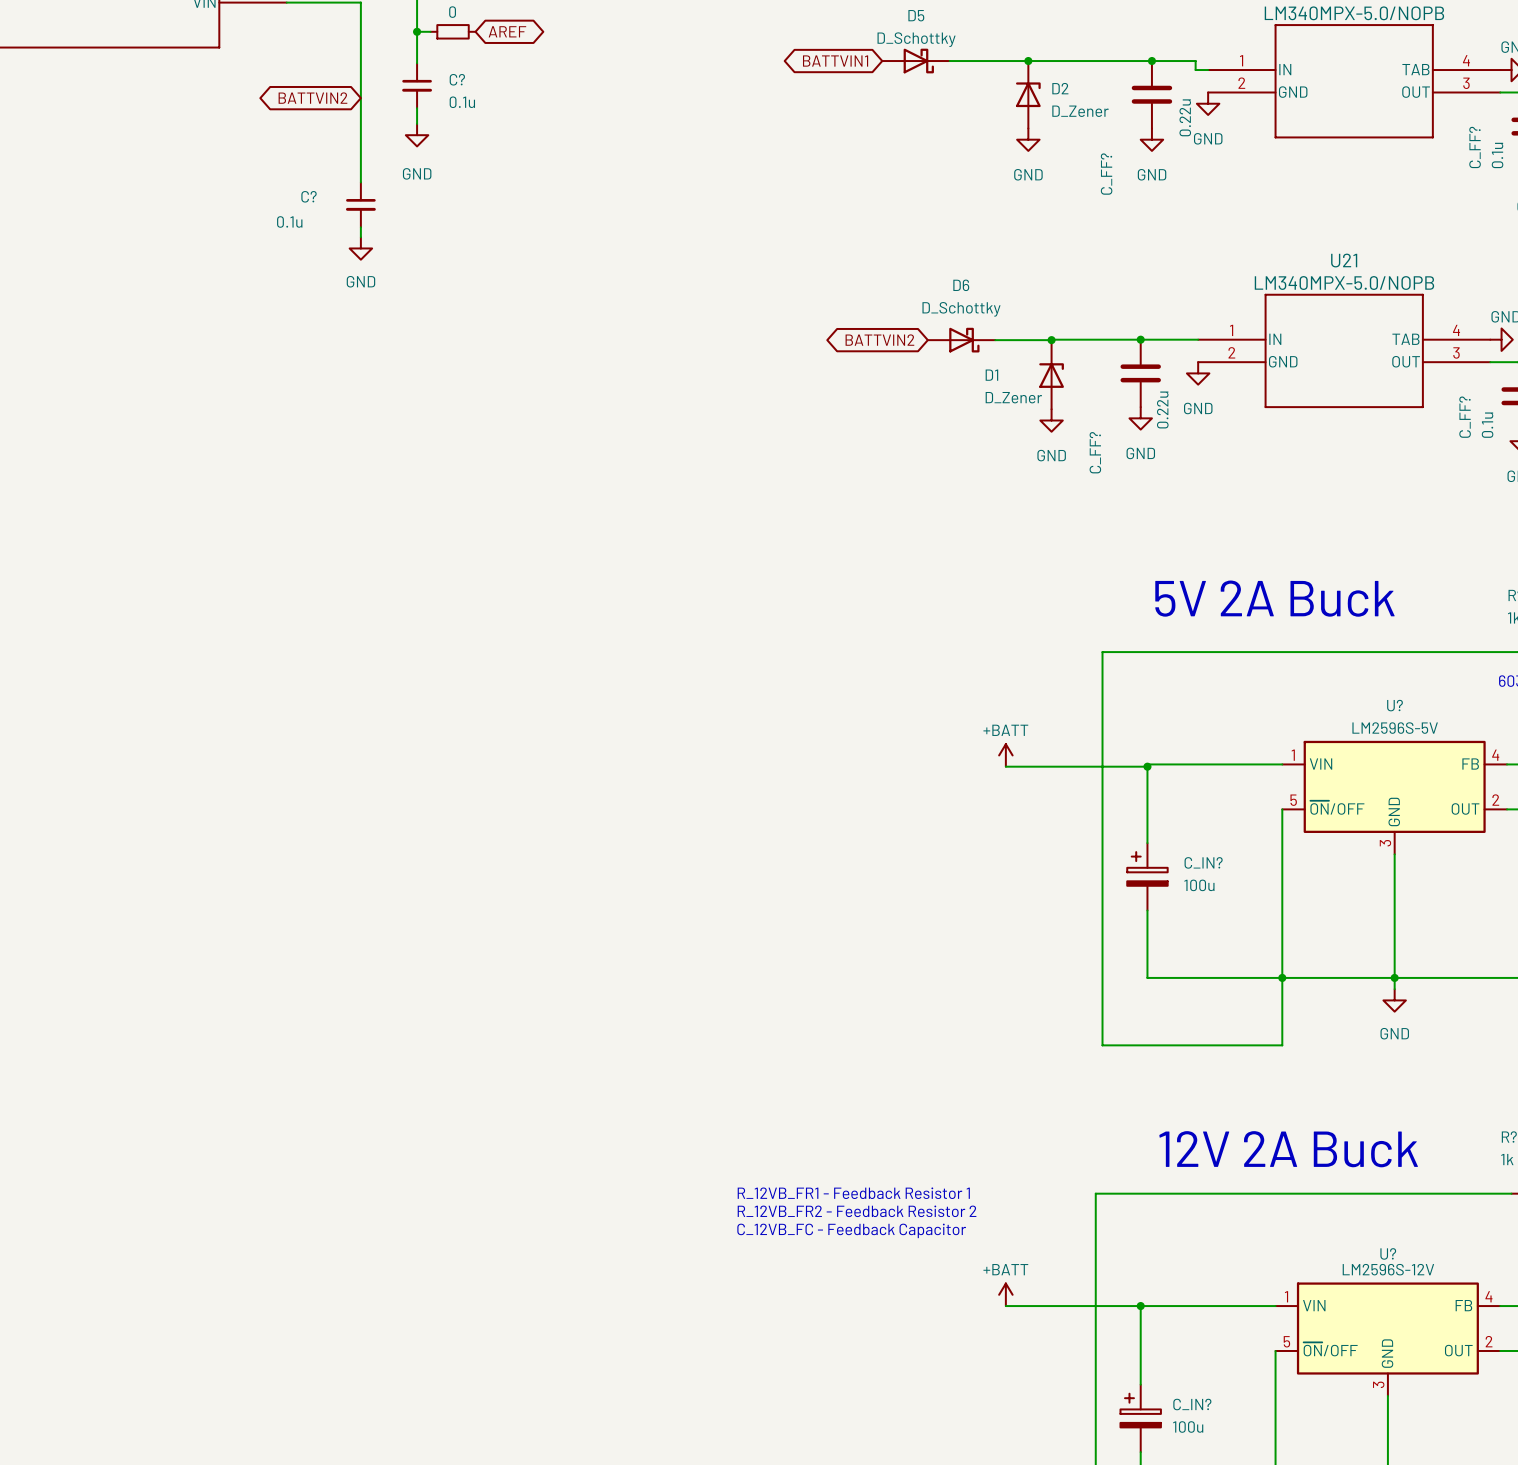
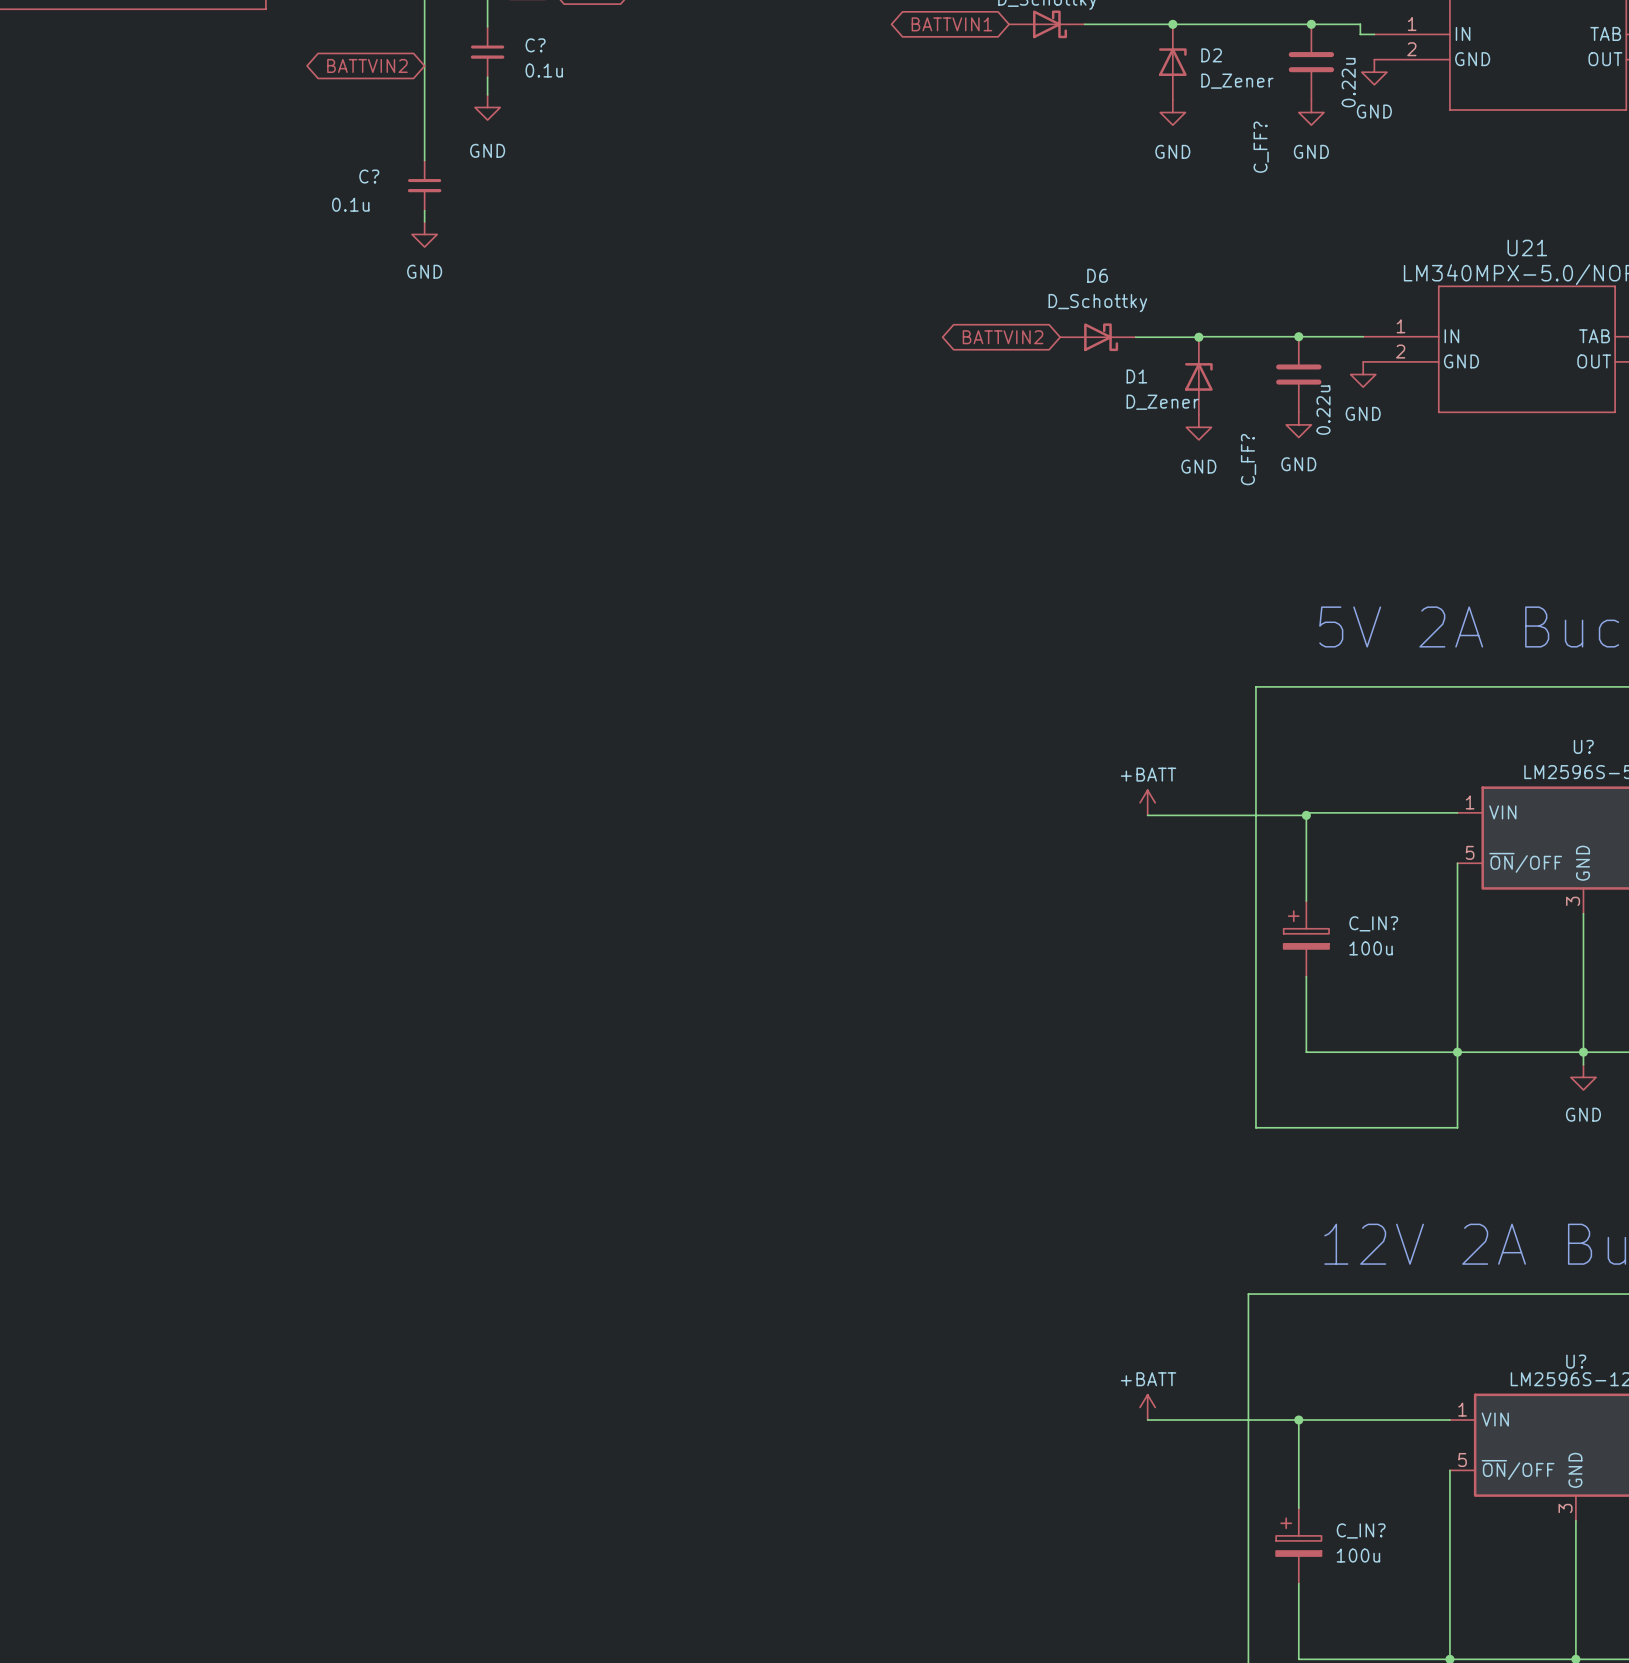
text: R_12VB_FR1 - Feedback Resistor 1 (853, 1193) -> none
text: R_12VB_FR2 - Feedback Resistor 2 (857, 1211) -> none
text: C_12VB_FC - Feedback Capacitor (851, 1230) -> none

